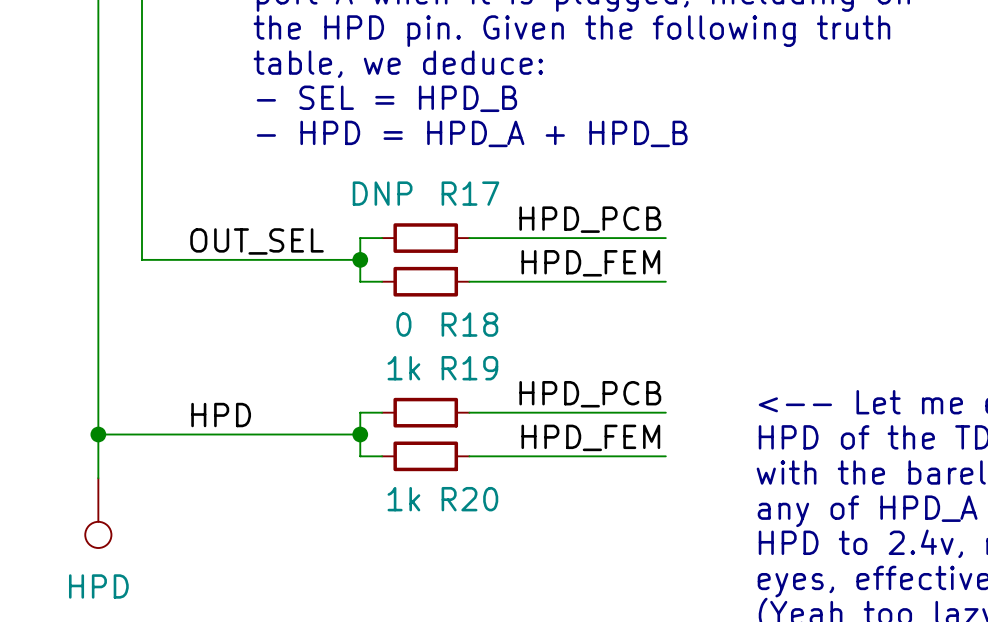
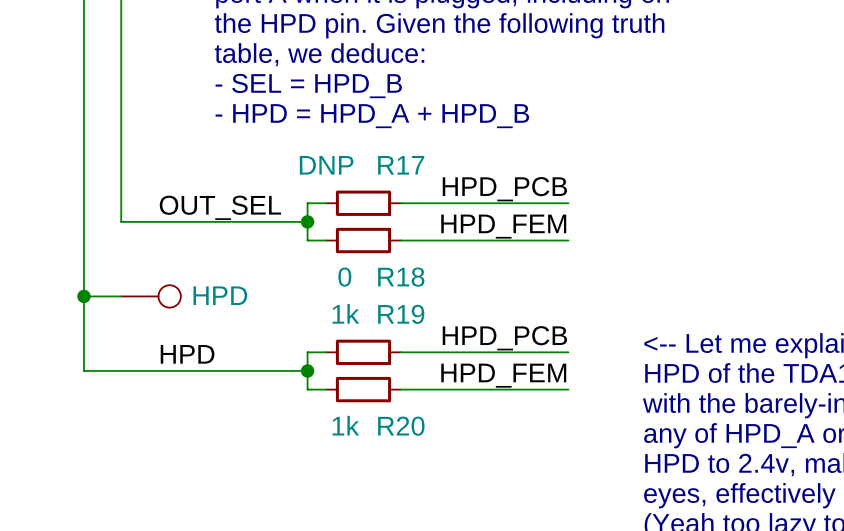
wire: none -> (83, 296) (121, 296)
wire: (98, 434) (98, 478) -> none
junction position: (98, 434) -> (83, 296)
part position: (98, 513) -> (151, 296)
part rotation: 0° (98, 534) -> 90° counterclockwise (169, 296)

